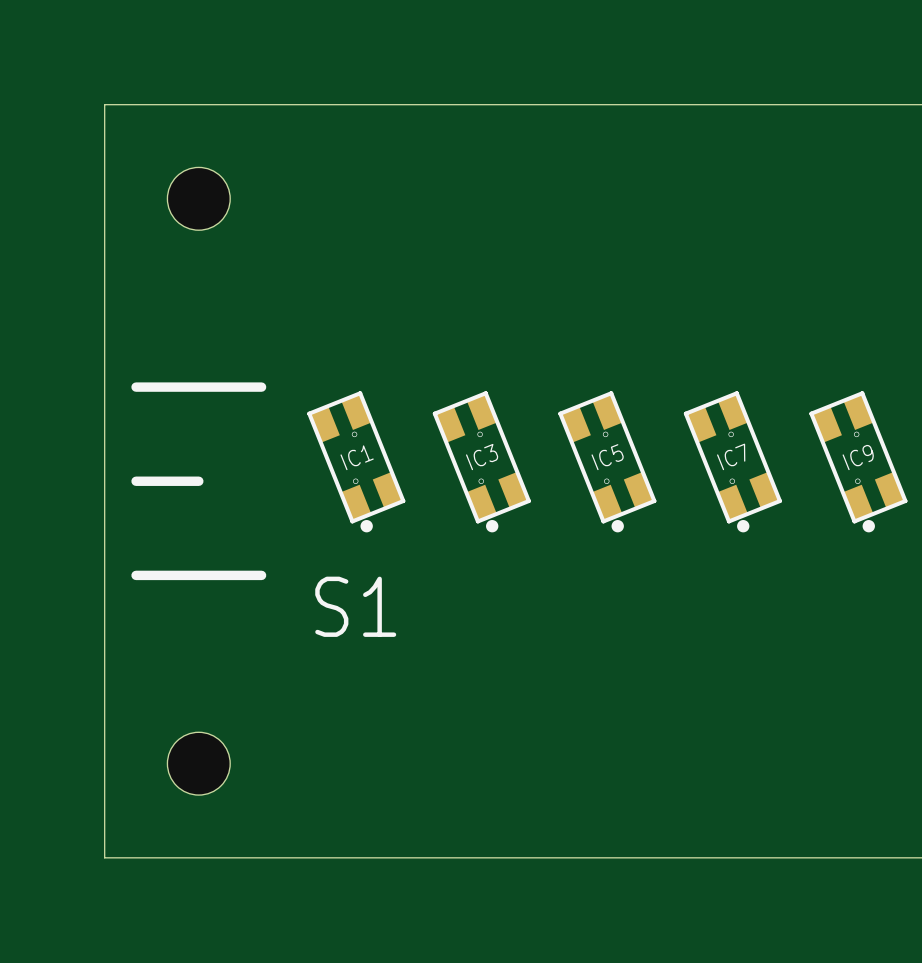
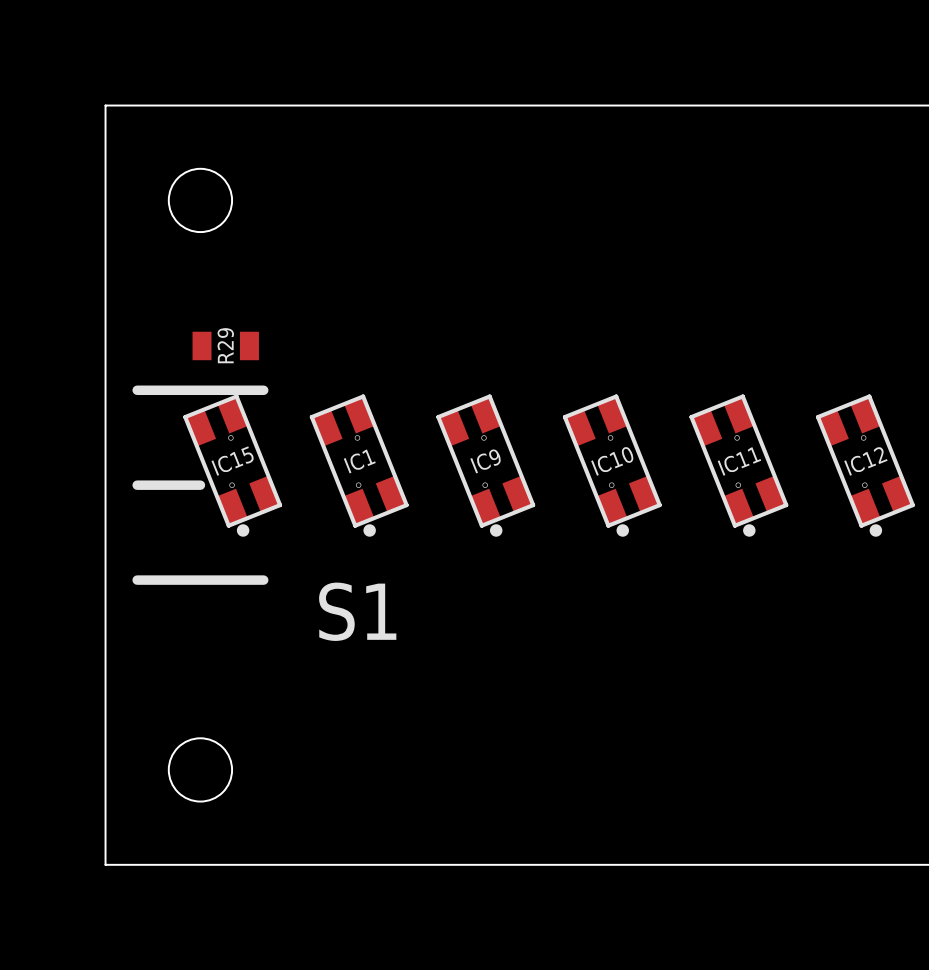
R29: none -> (225, 345)
IC7 name: IC7 (731, 456) -> IC11 (739, 461)
IC3 name: IC3 (482, 457) -> IC9 (485, 461)
IC5 name: IC5 (607, 457) -> IC10 (612, 461)
IC9 name: IC9 (858, 457) -> IC12 (865, 461)
IC15: none -> (232, 465)

